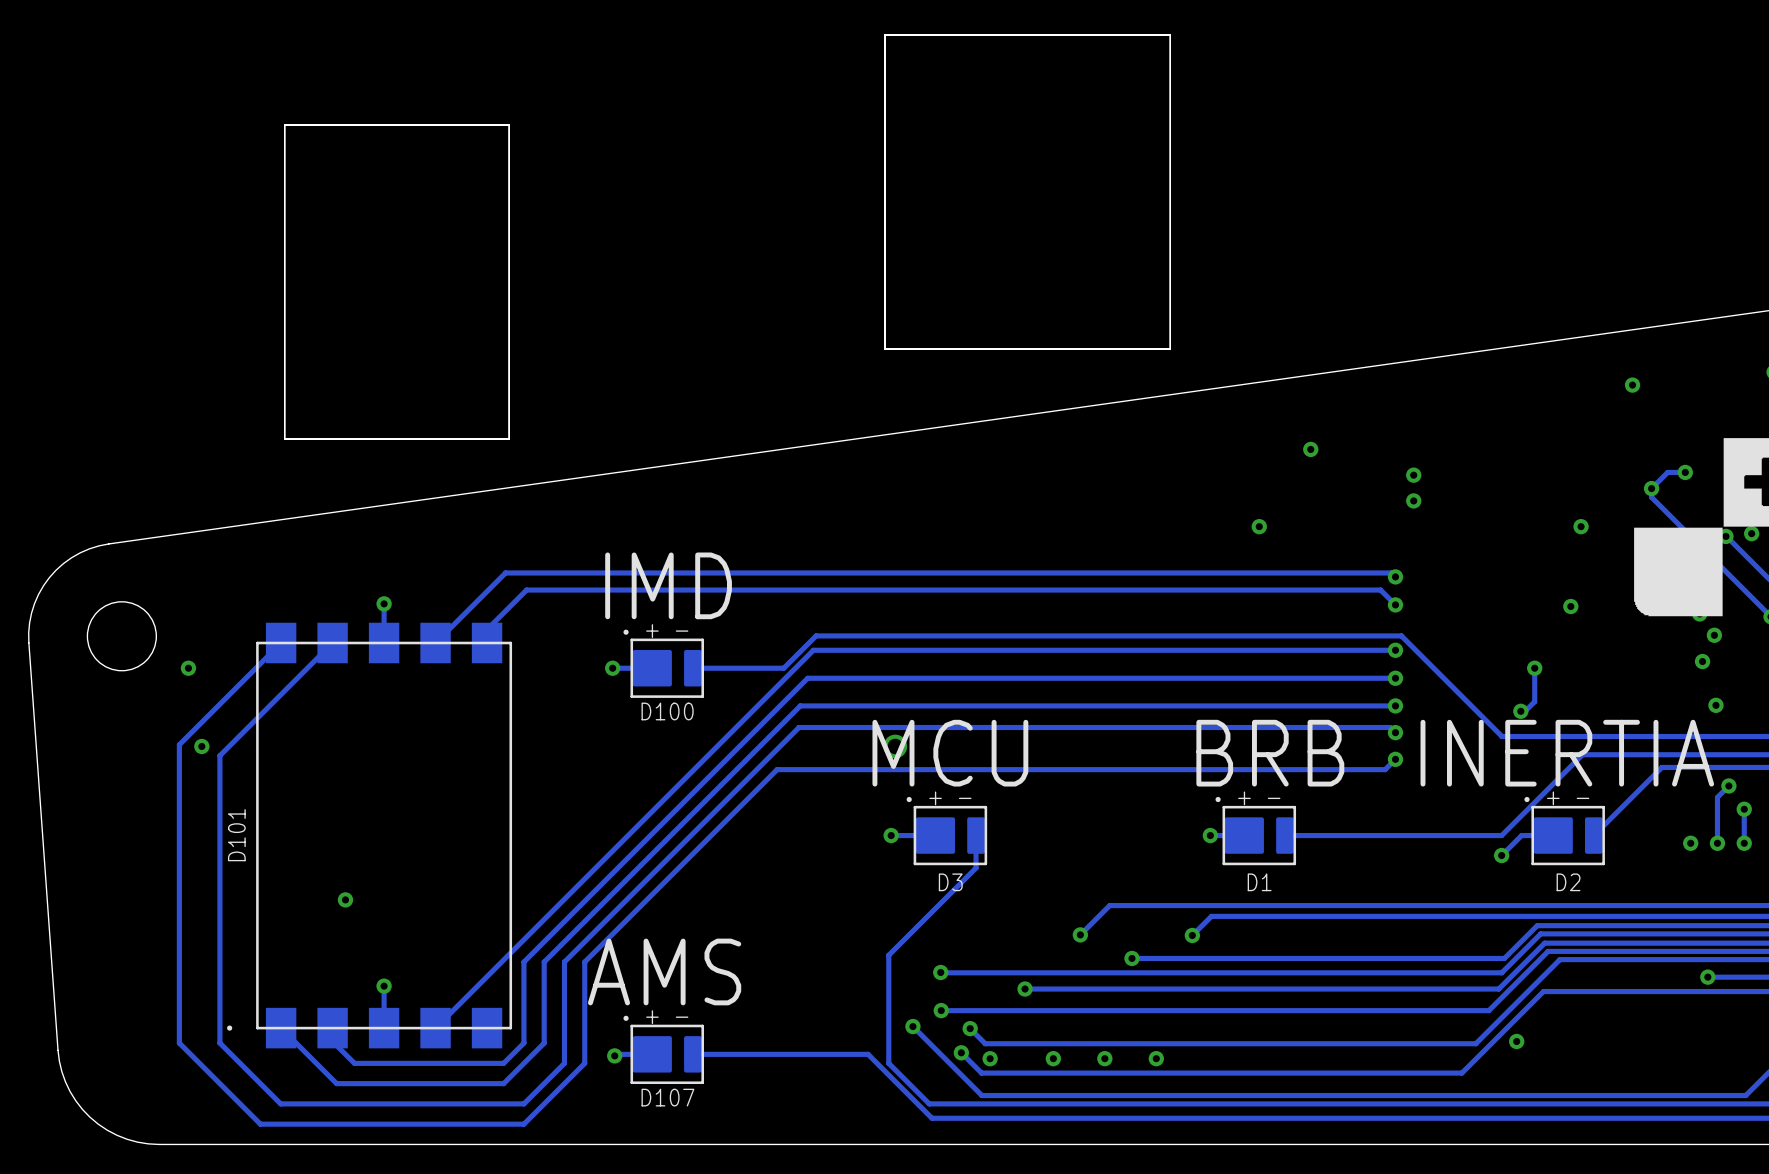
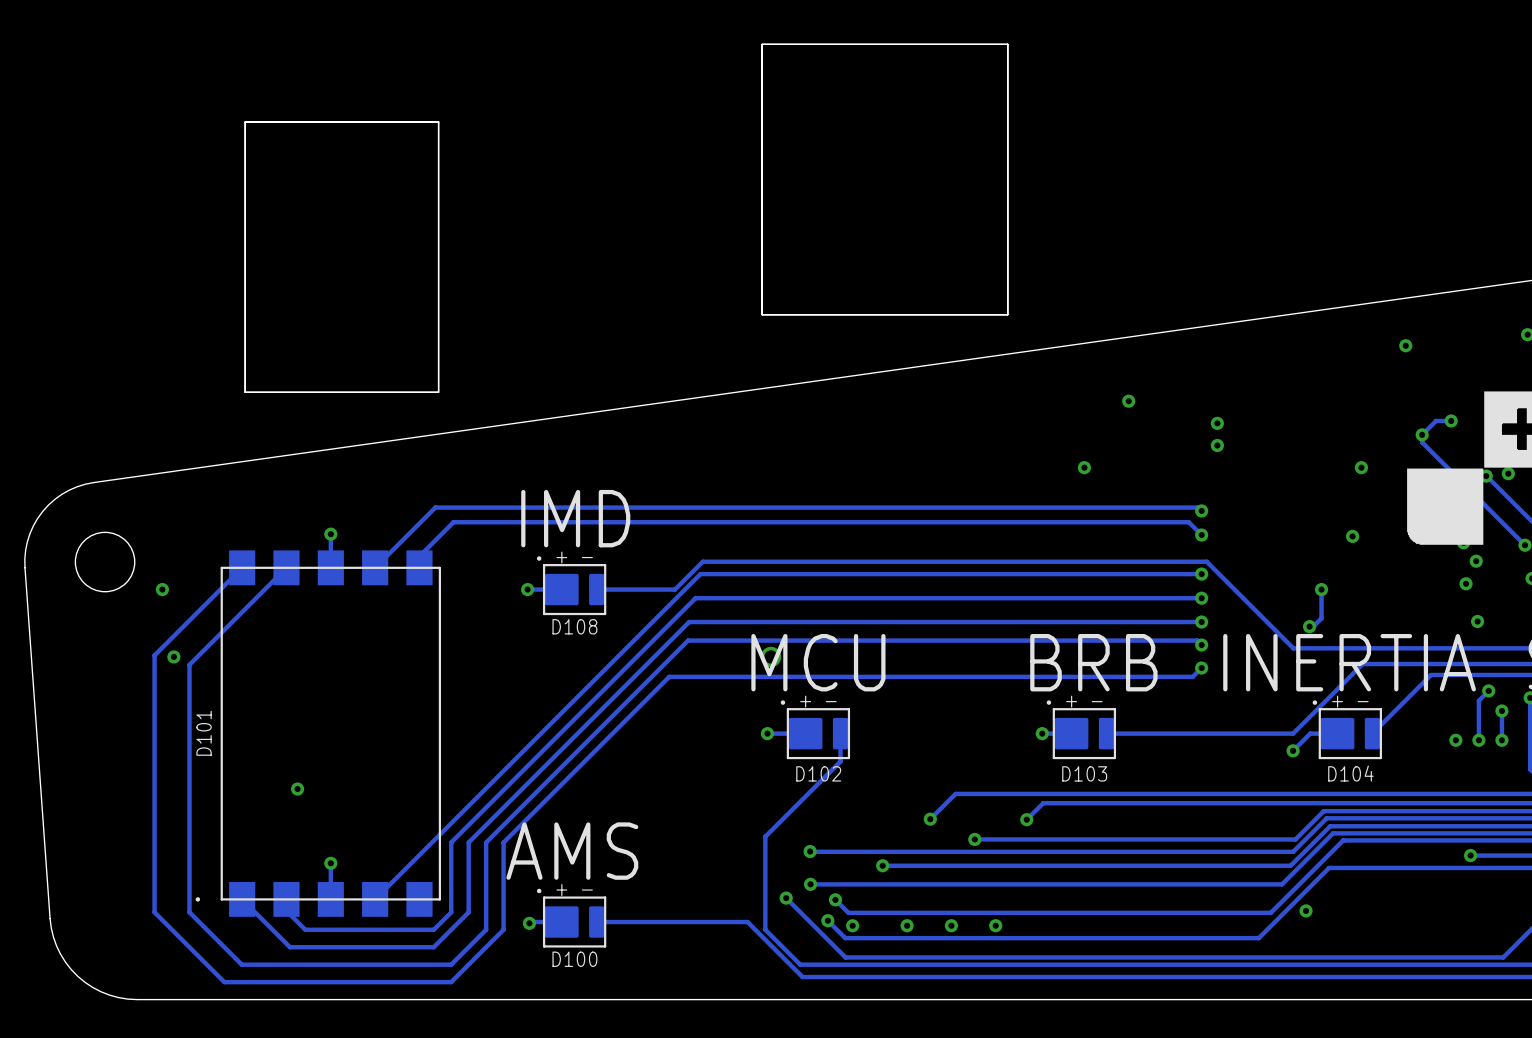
D100 name: D100 (667, 711) -> D108 (574, 626)
D3 name: D3 (950, 882) -> D102 (818, 773)
D1 name: D1 (1259, 882) -> D103 (1084, 773)
D2 name: D2 (1568, 882) -> D104 (1350, 773)
D107 name: D107 (667, 1097) -> D100 (574, 959)

